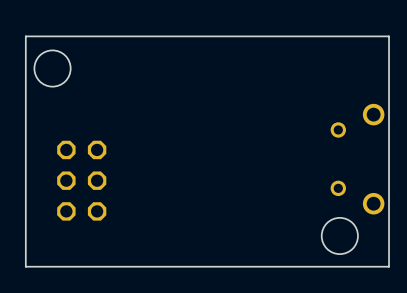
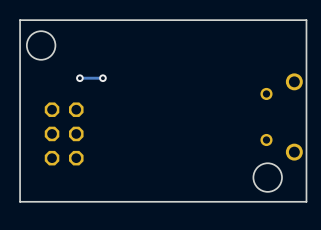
via: none -> (79, 78)
track: none -> (102, 78) (79, 78)
via: none -> (102, 78)

